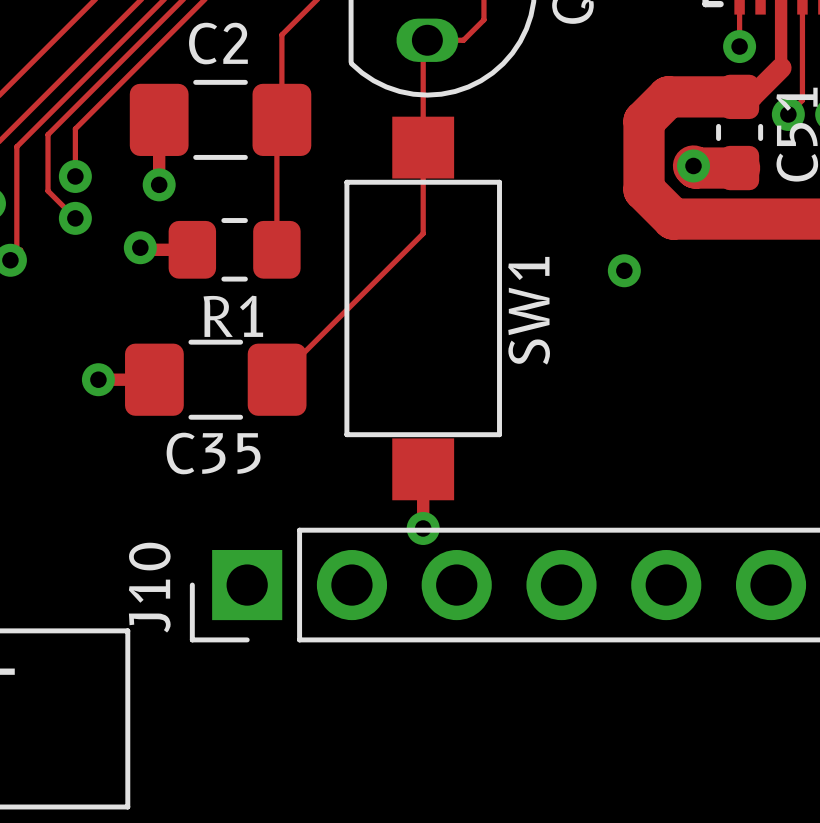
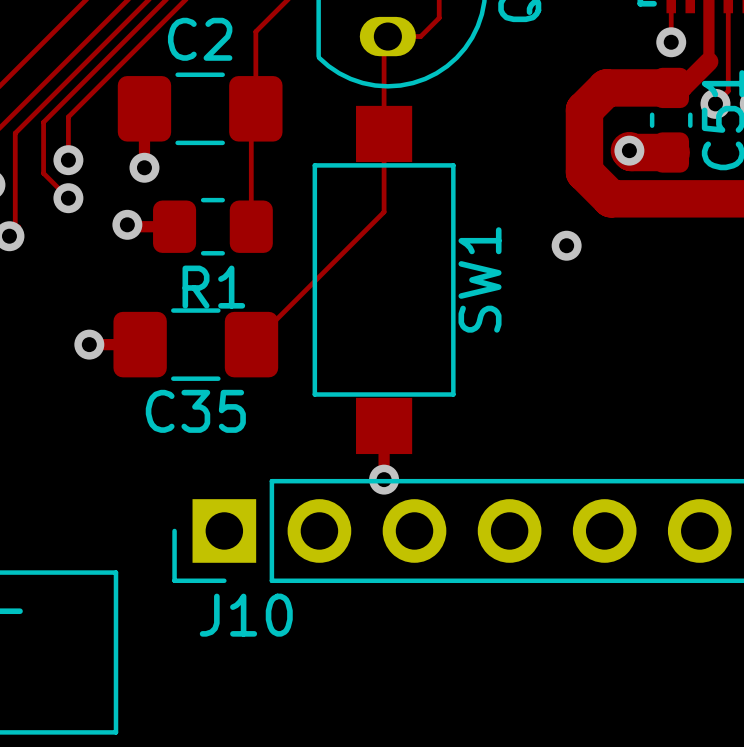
J10 name rotation: 0° (149, 587) -> 90° clockwise (246, 615)
J10 name position: J10 (149, 587) -> J10 (246, 615)

